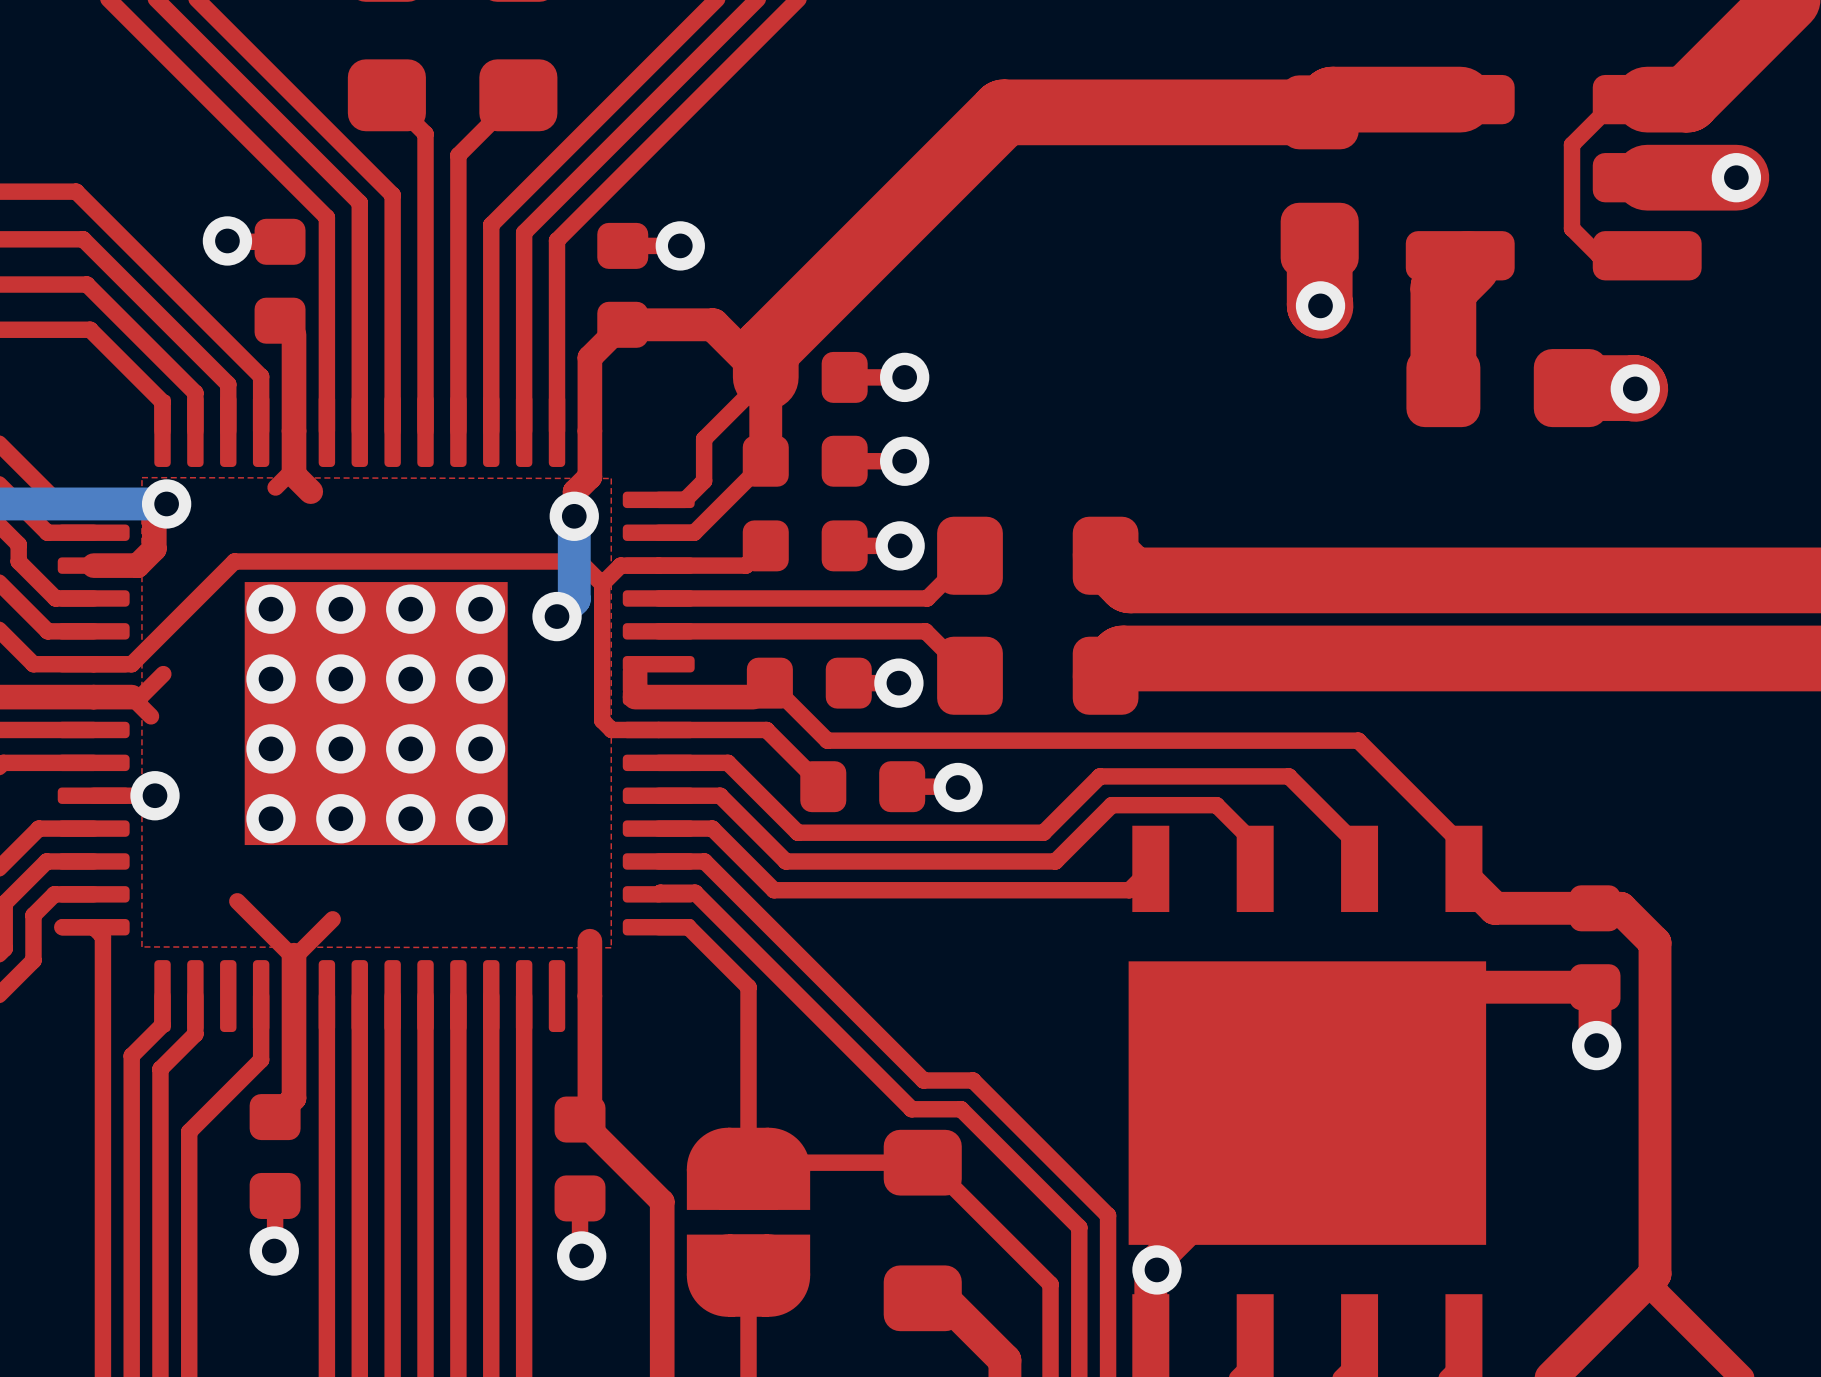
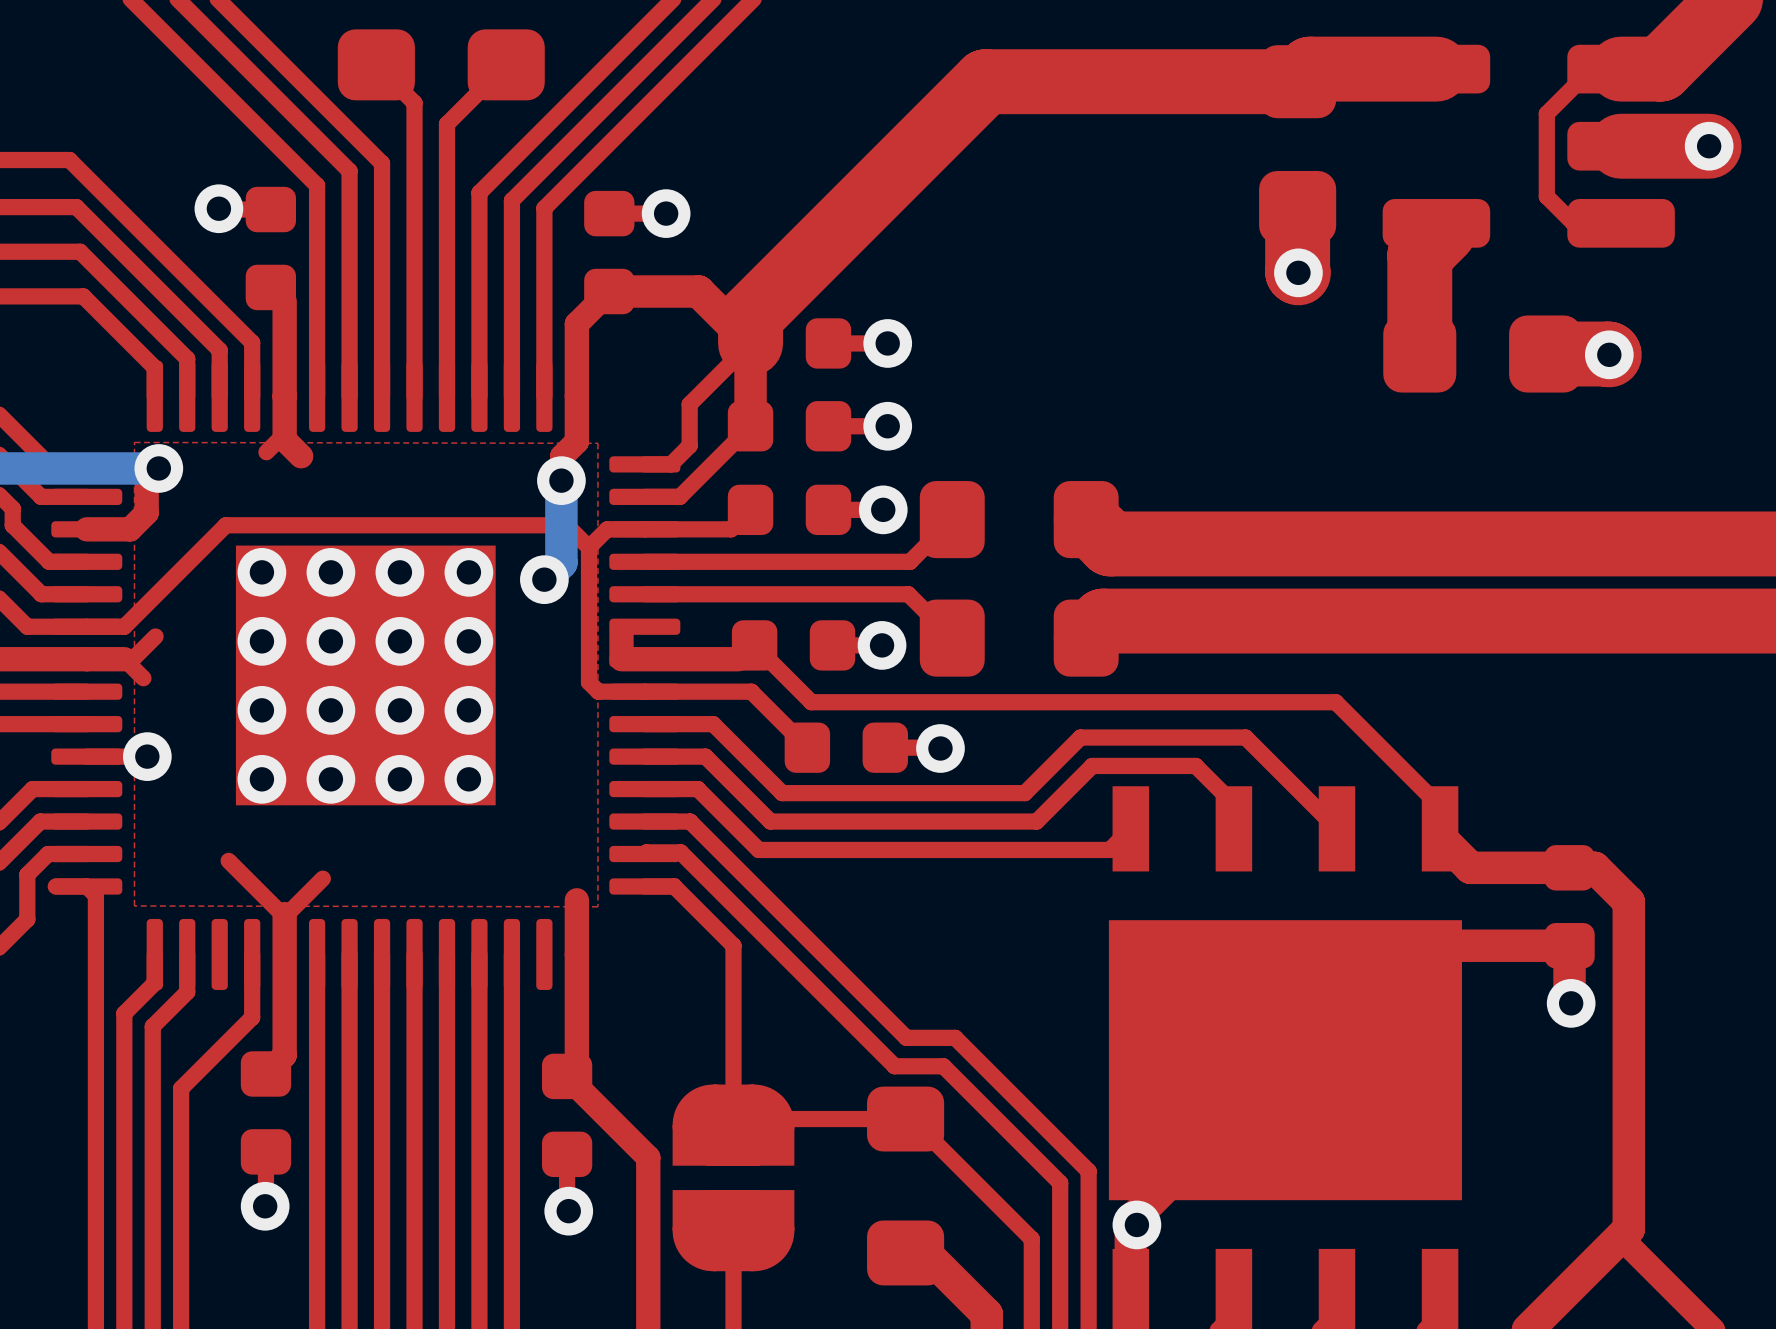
top track: (1267, 776) (1288, 776) (1359, 847) (1359, 868) -> (1245, 737) (1336, 828)

